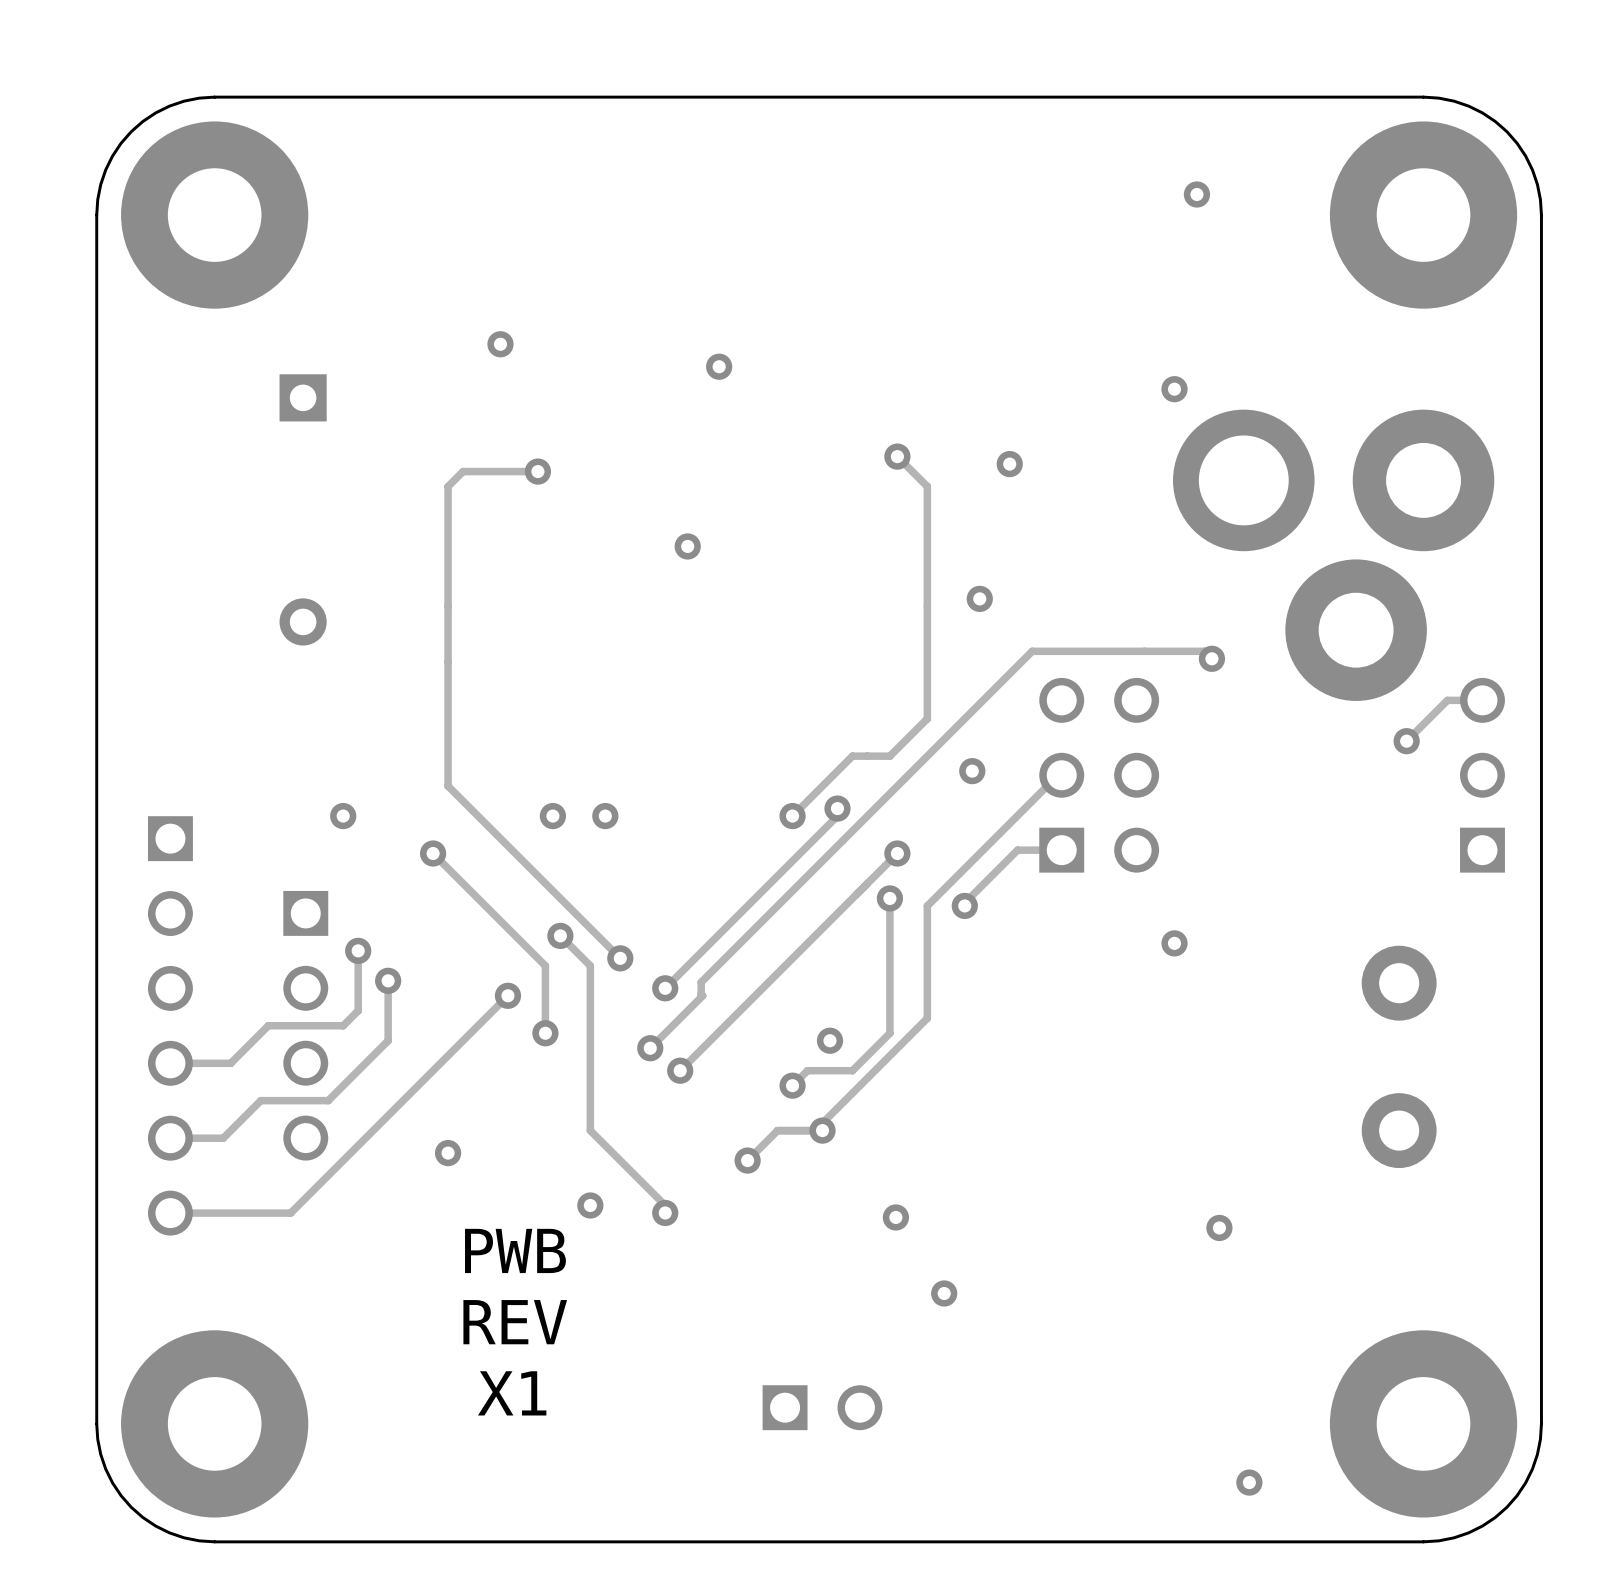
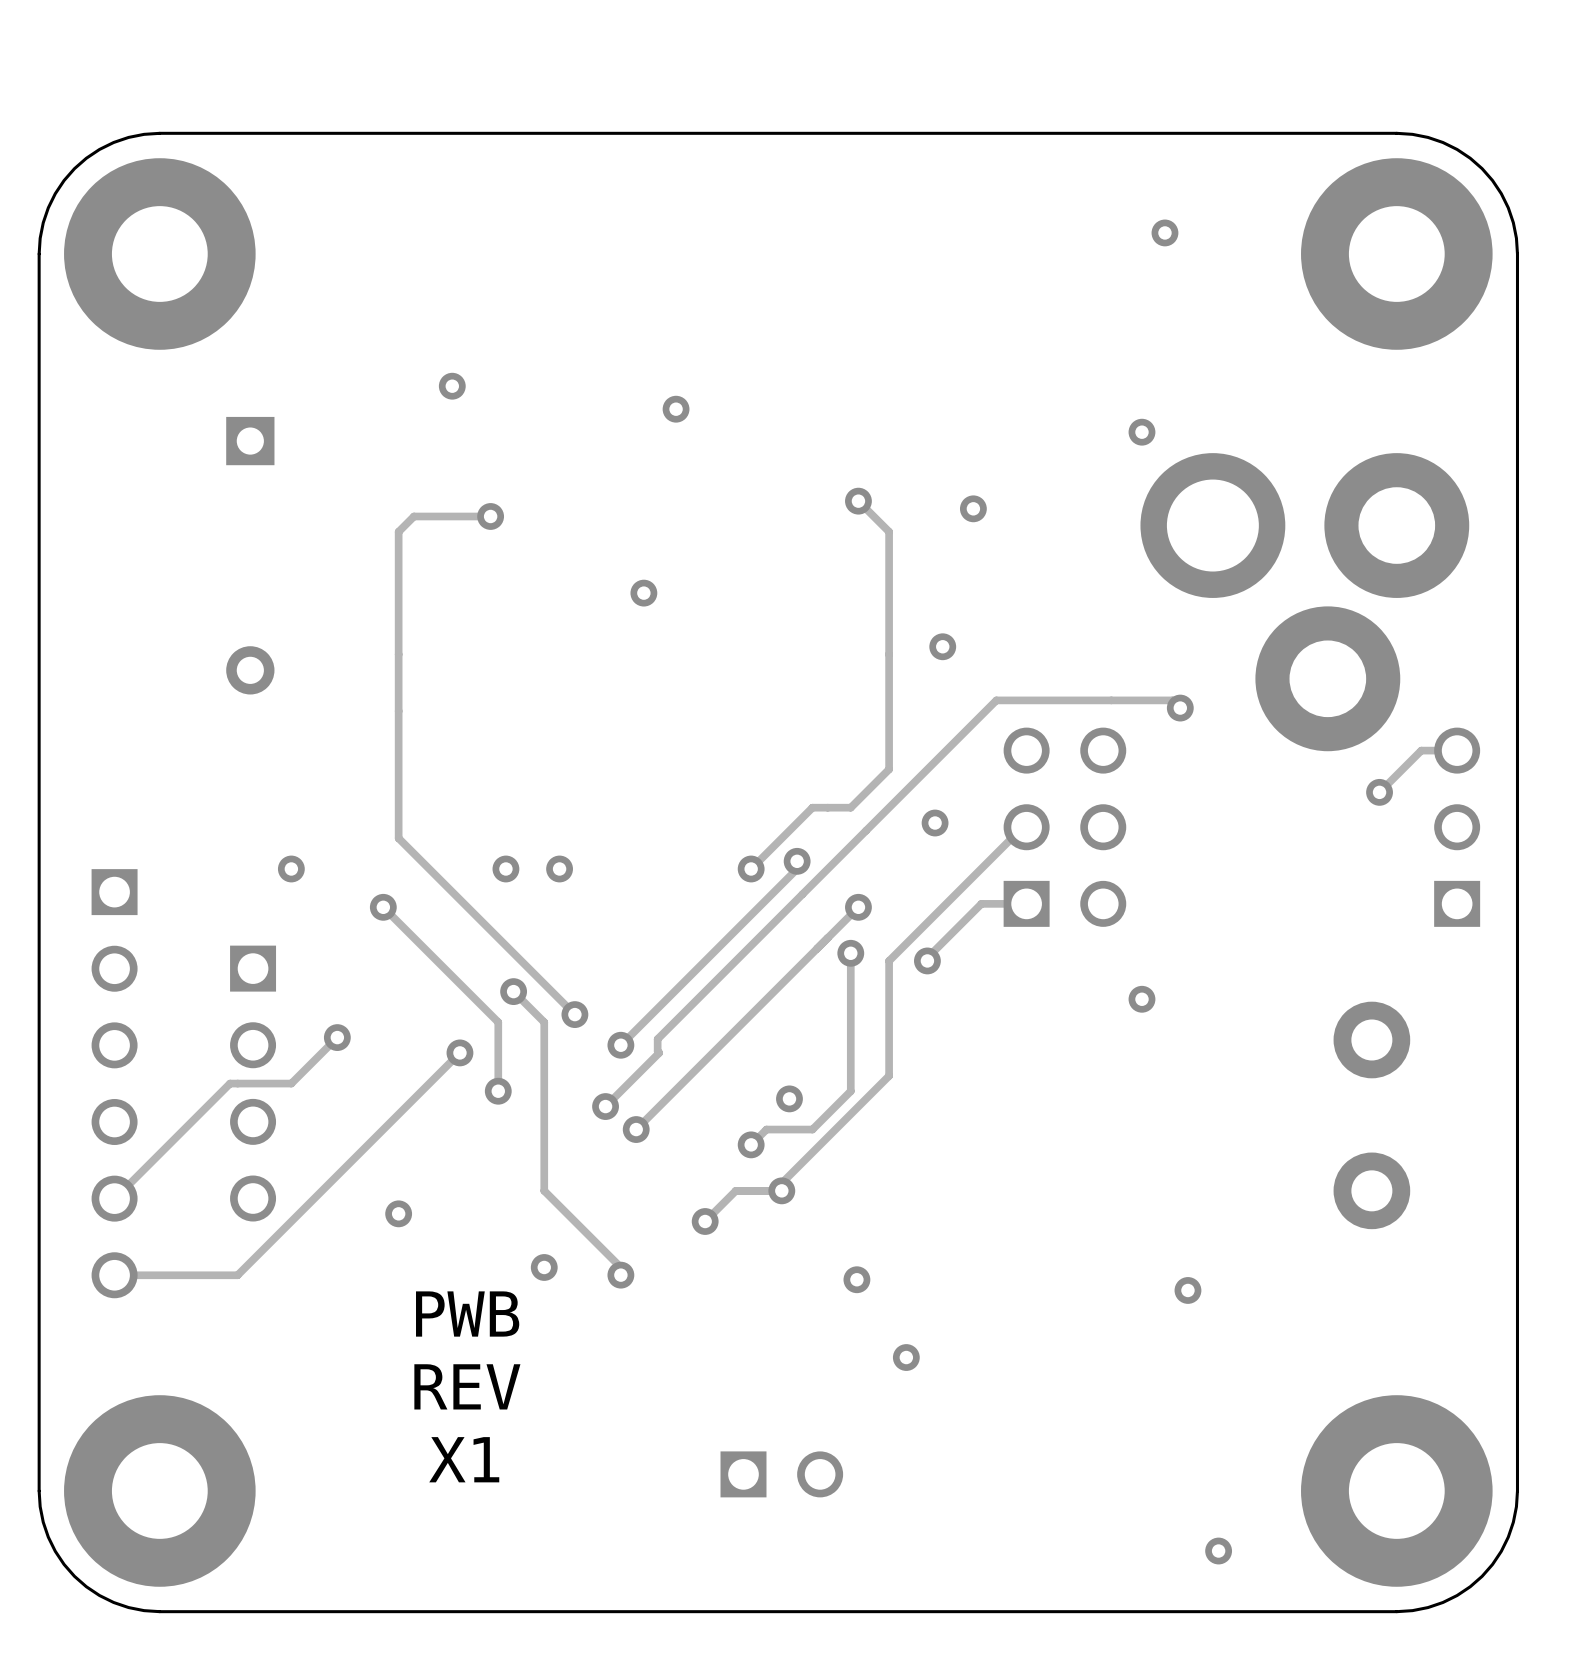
track: (358, 950) (358, 1010) -> (337, 1037) (306, 1068)
via: (358, 950) -> none
track: (388, 980) (388, 1040) (328, 1100) (260, 1100) (223, 1138) (170, 1138) -> none
track: (283, 1025) (268, 1025) (230, 1063) (170, 1063) -> (230, 1083) (114, 1198)

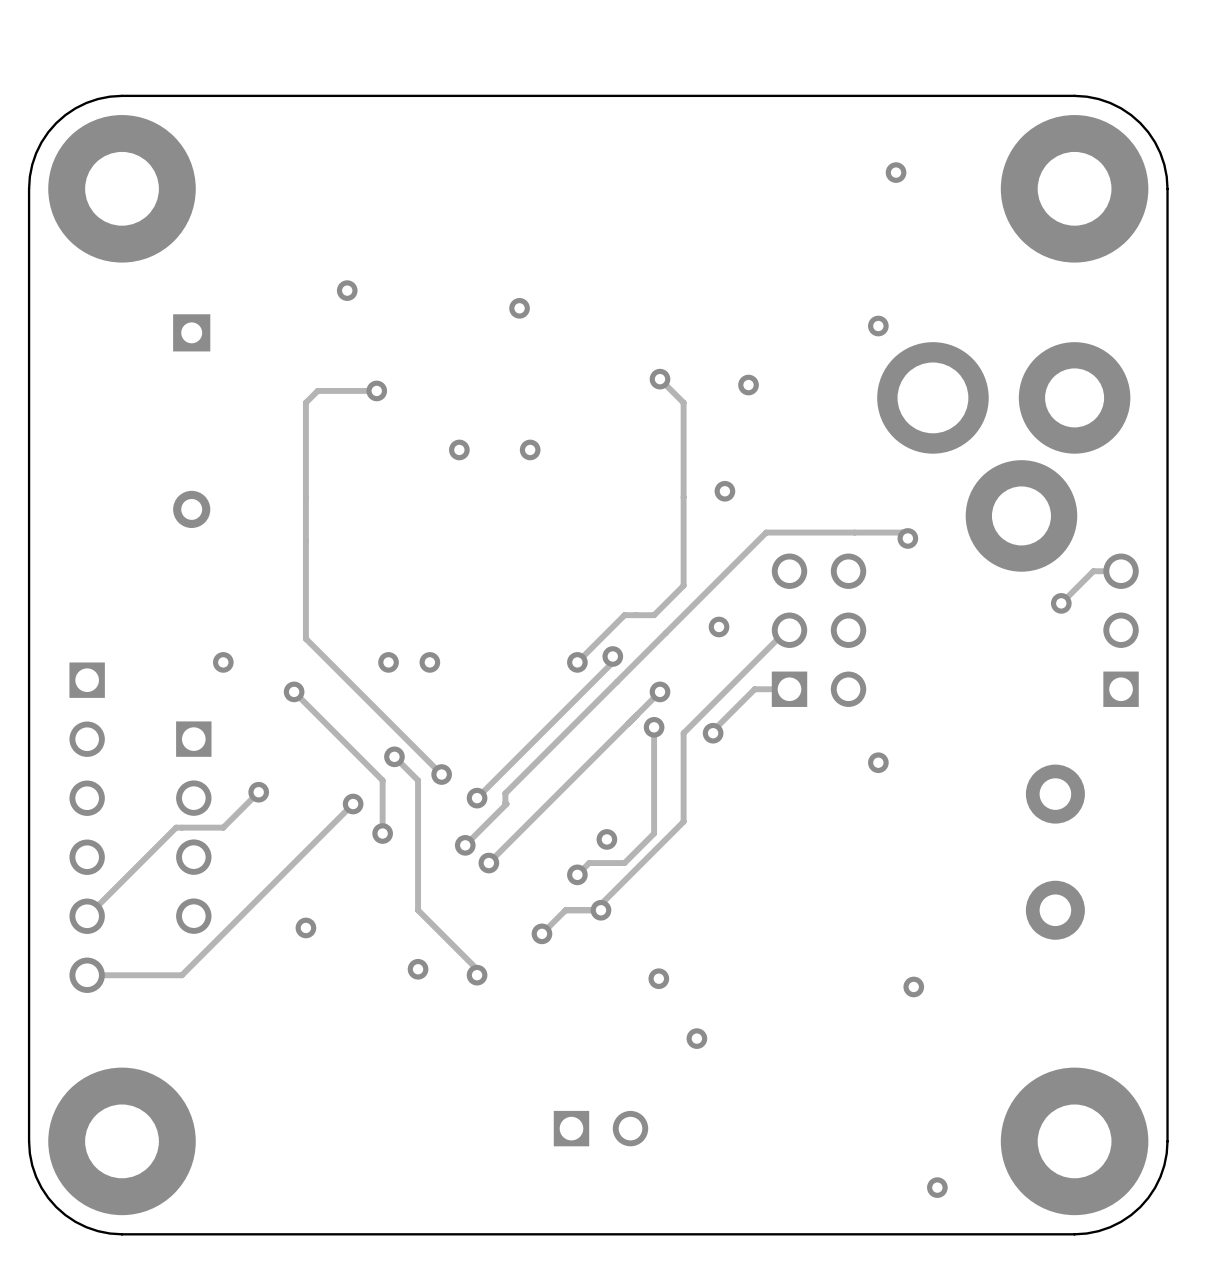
via: none -> (459, 449)
via: (643, 593) -> none
via: none -> (530, 449)
text: PWB (467, 1314) -> none
text: REV (467, 1386) -> none
text: X1 (464, 1459) -> none

